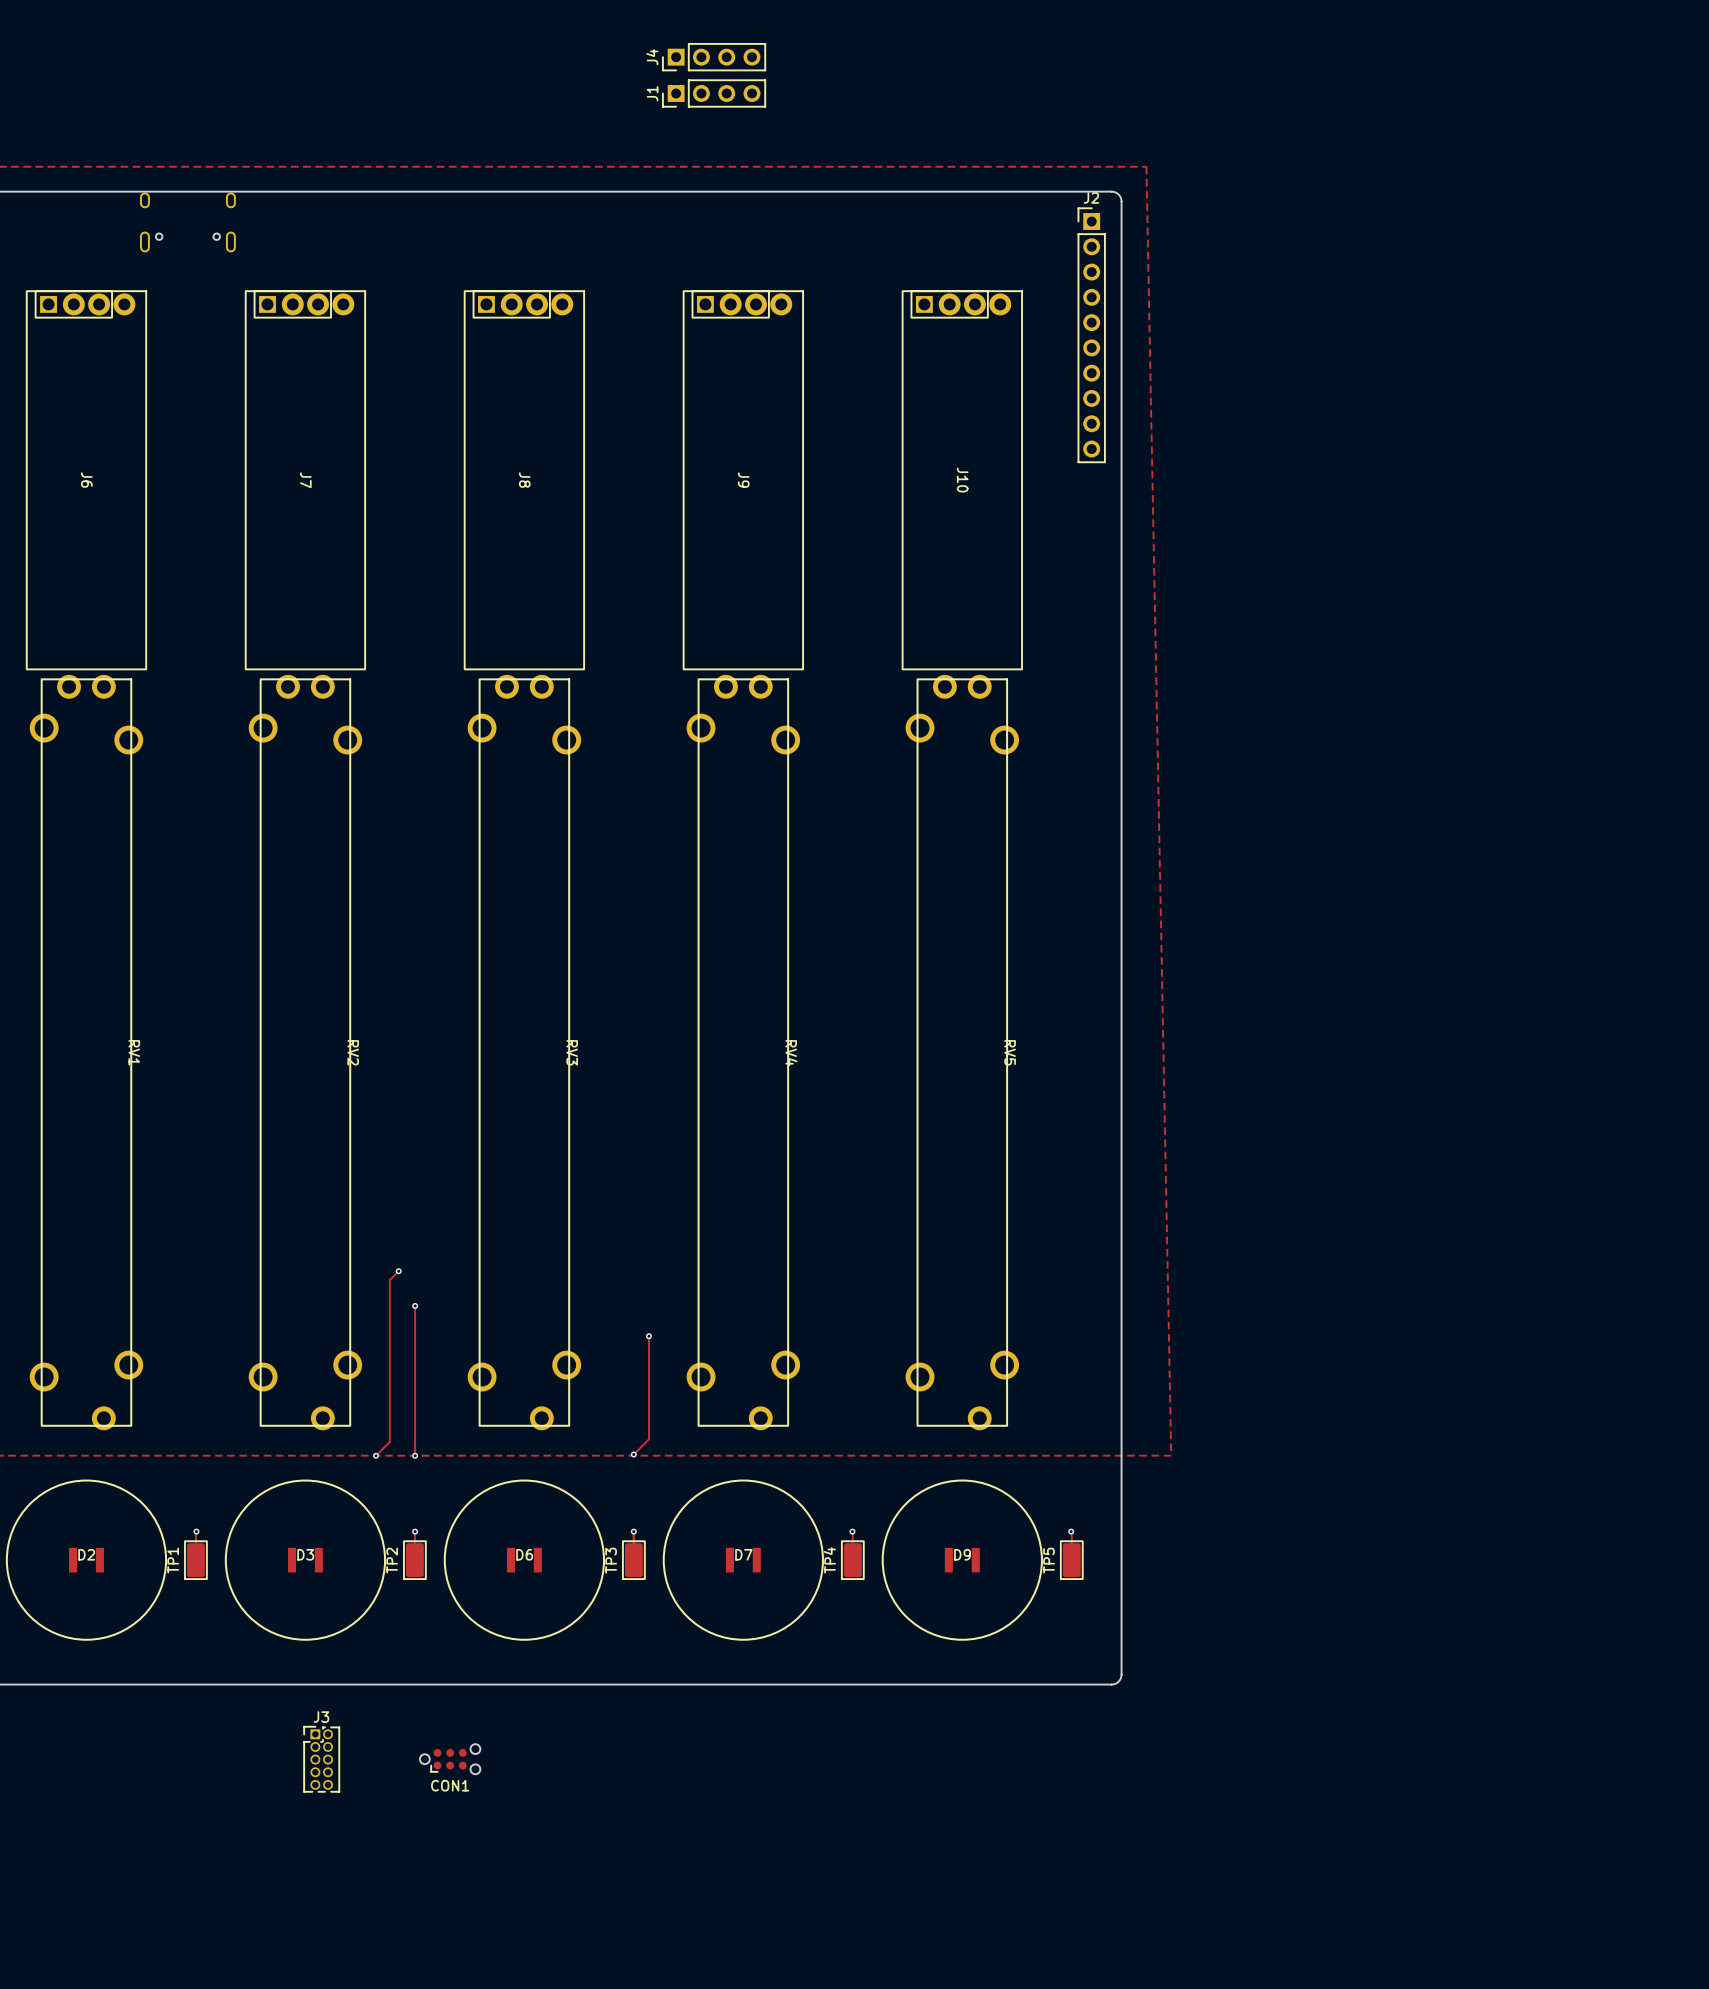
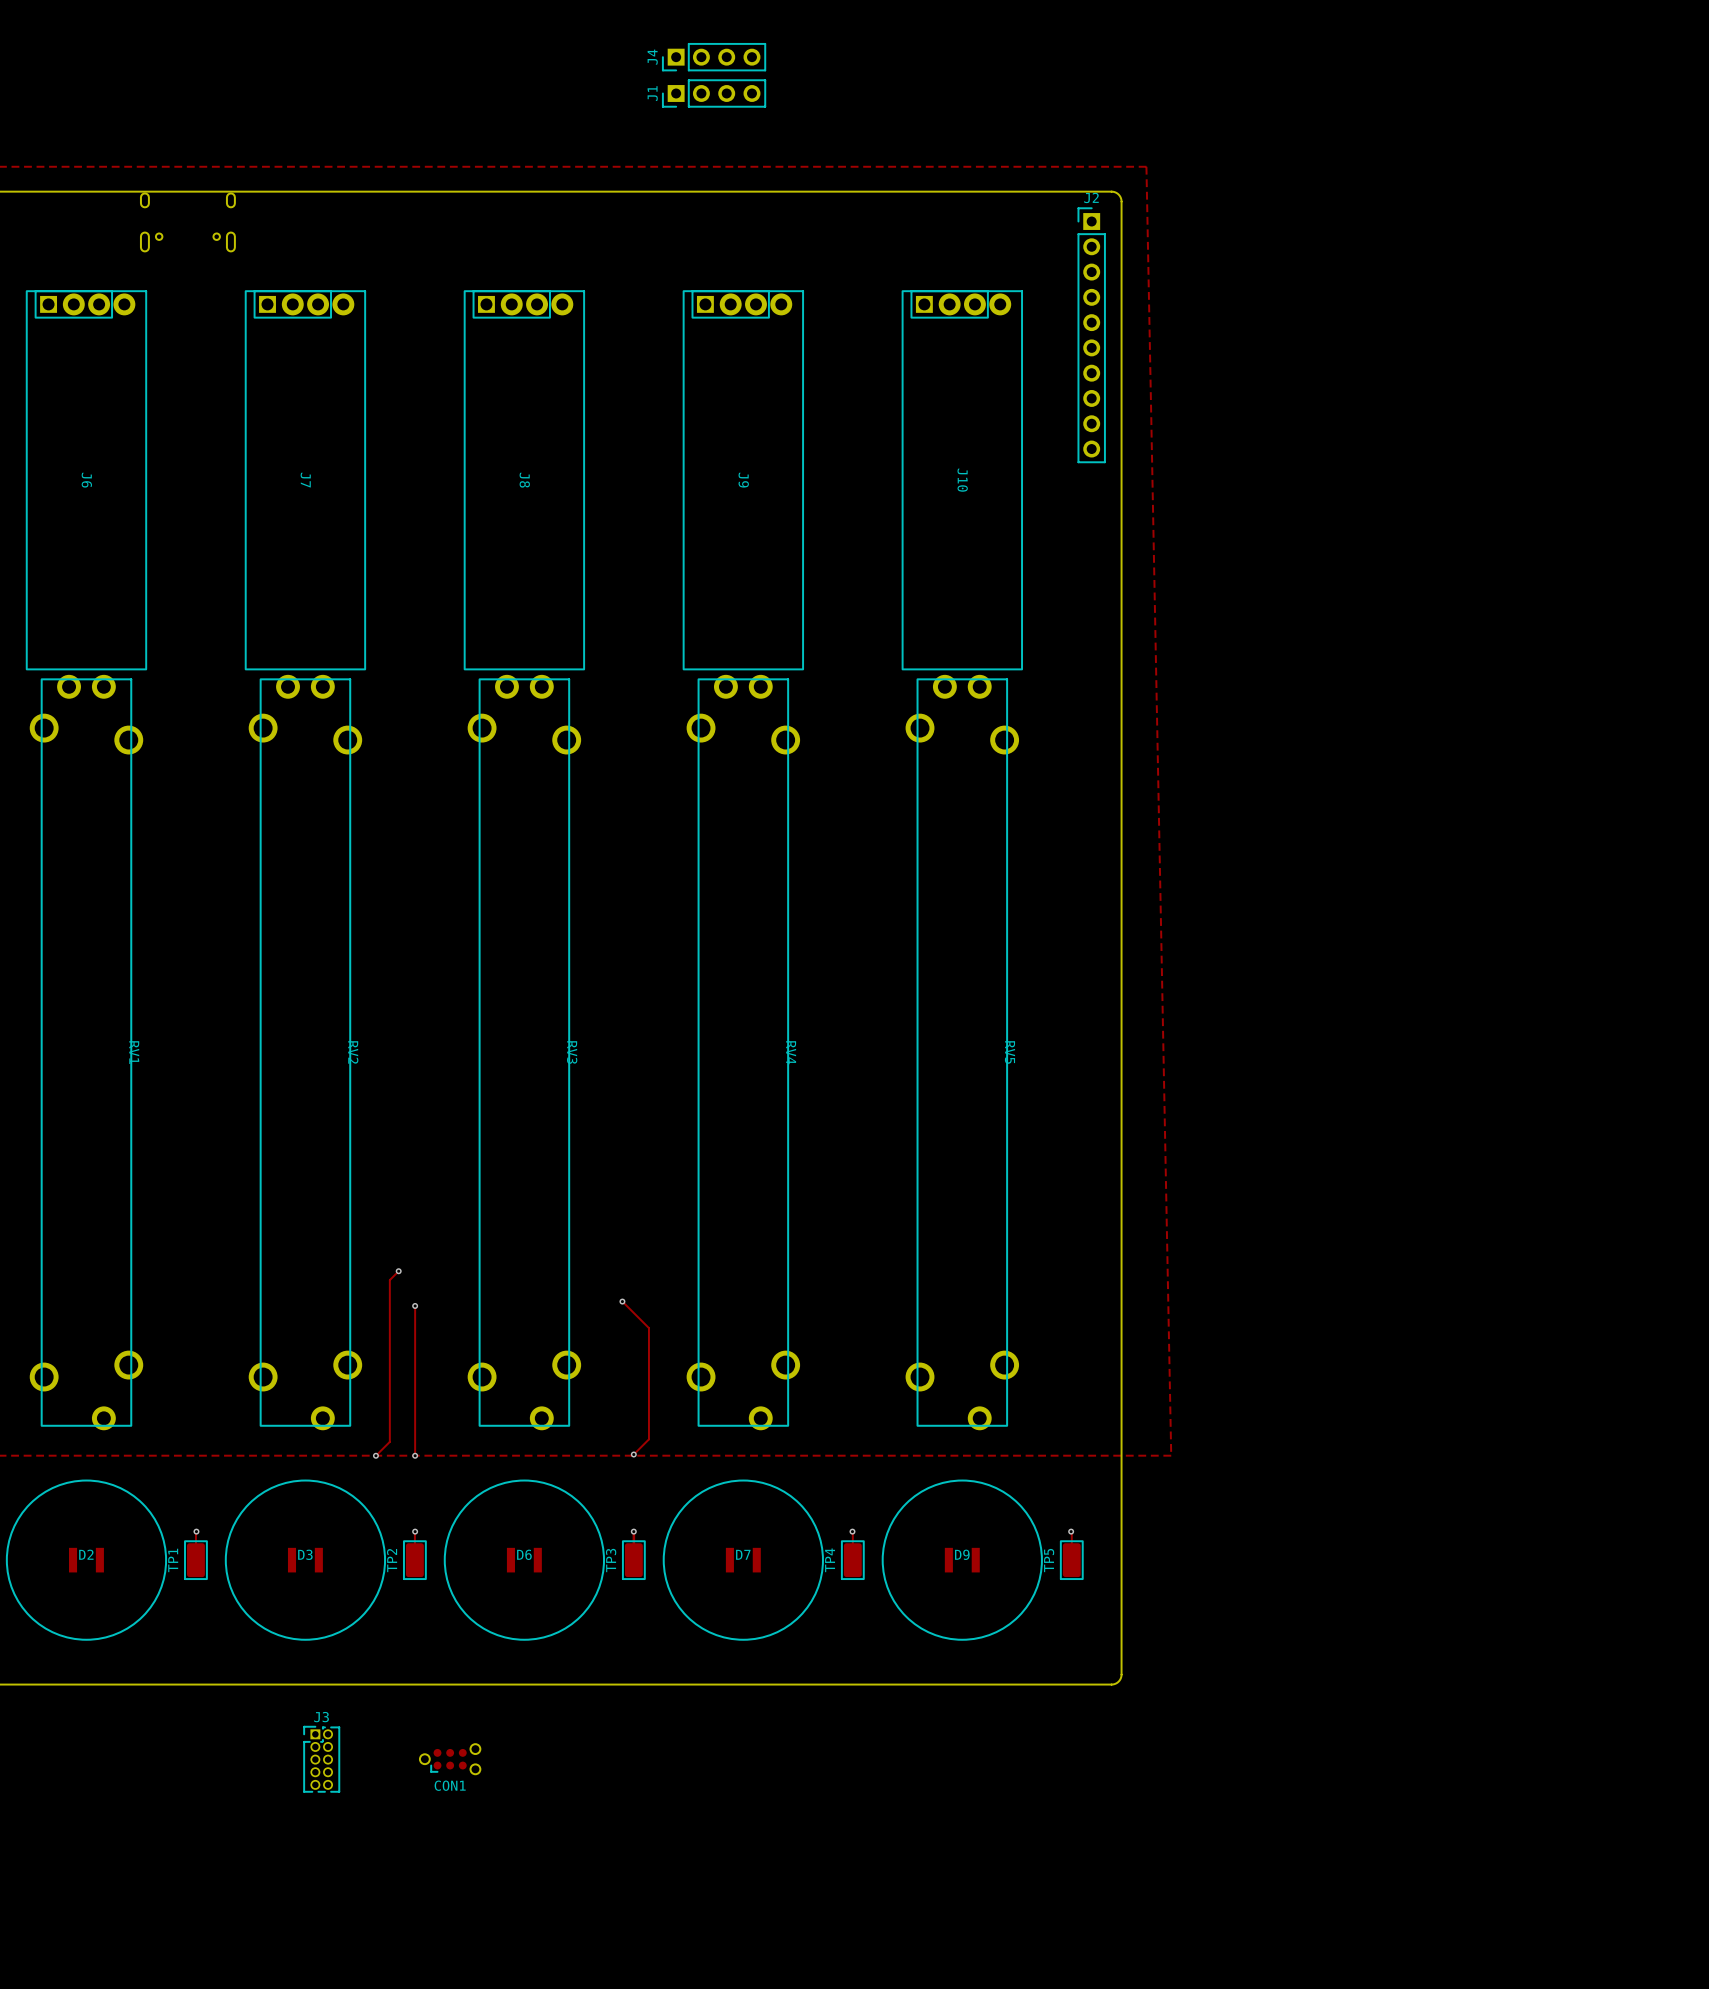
track: none -> (622, 1301) (648, 1328) (648, 1336)
via position: (648, 1336) -> (622, 1301)

